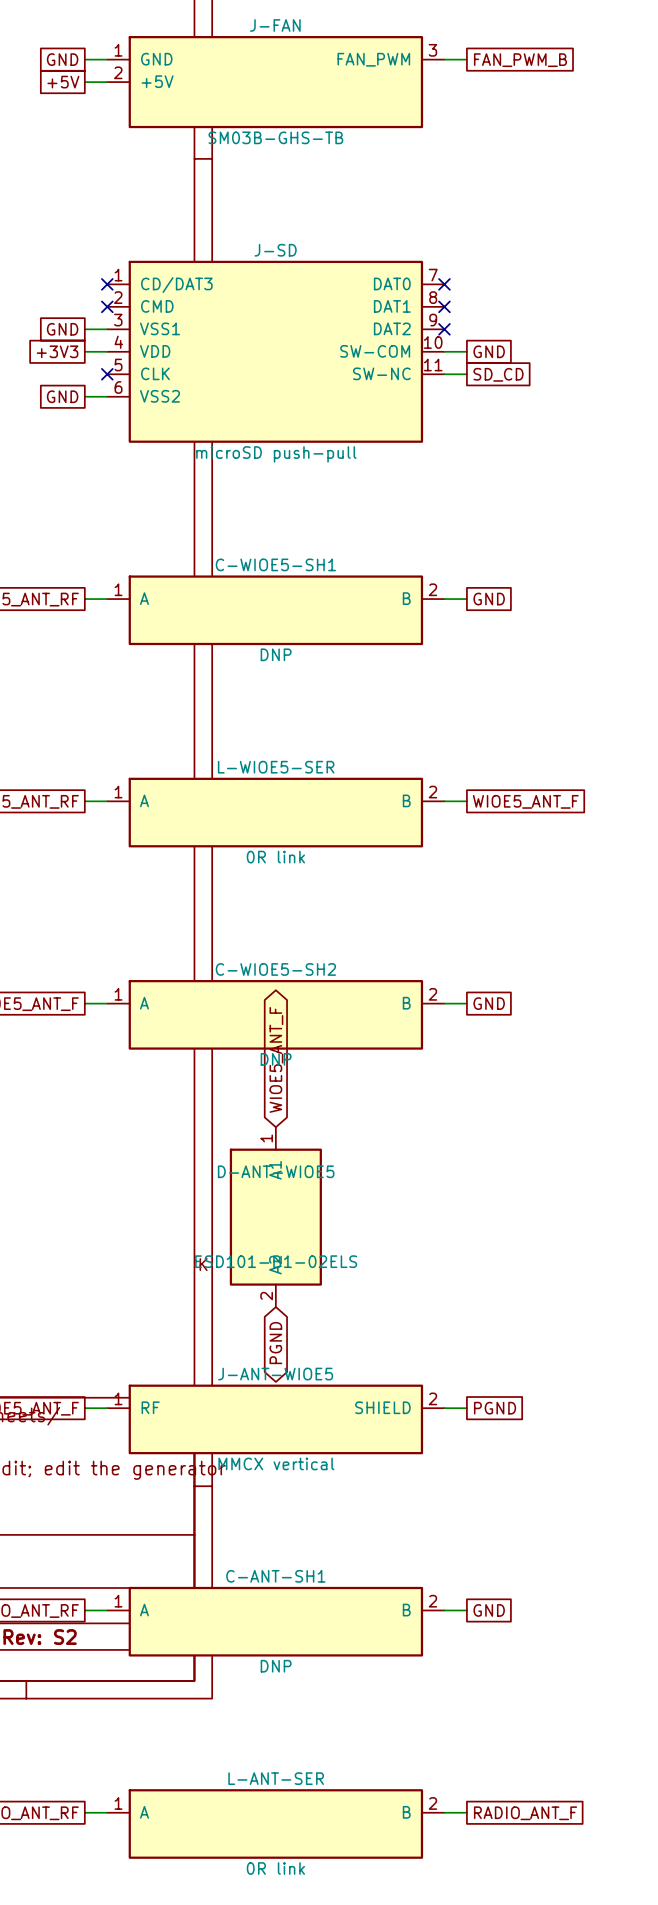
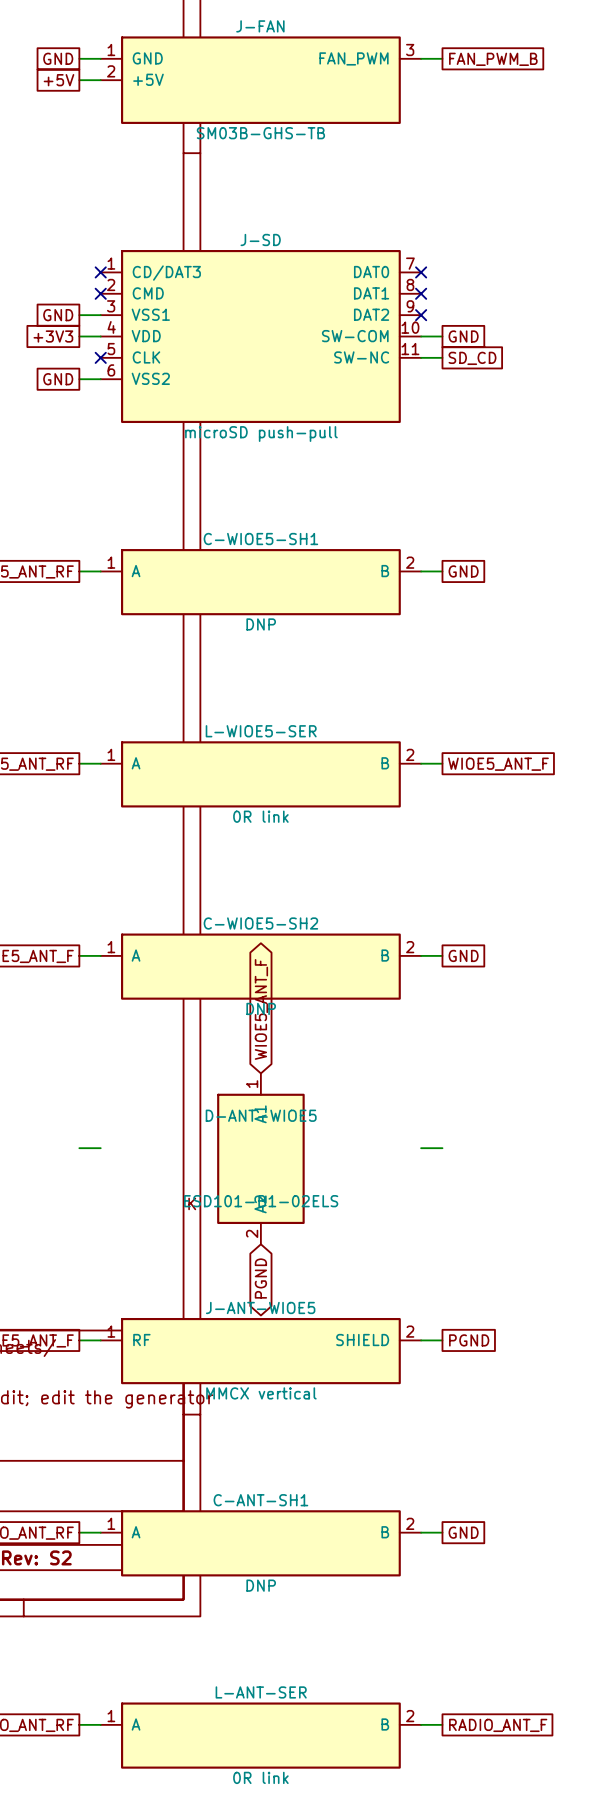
wire: none -> (79, 1148) (100, 1148)
wire: none -> (421, 1148) (442, 1148)

